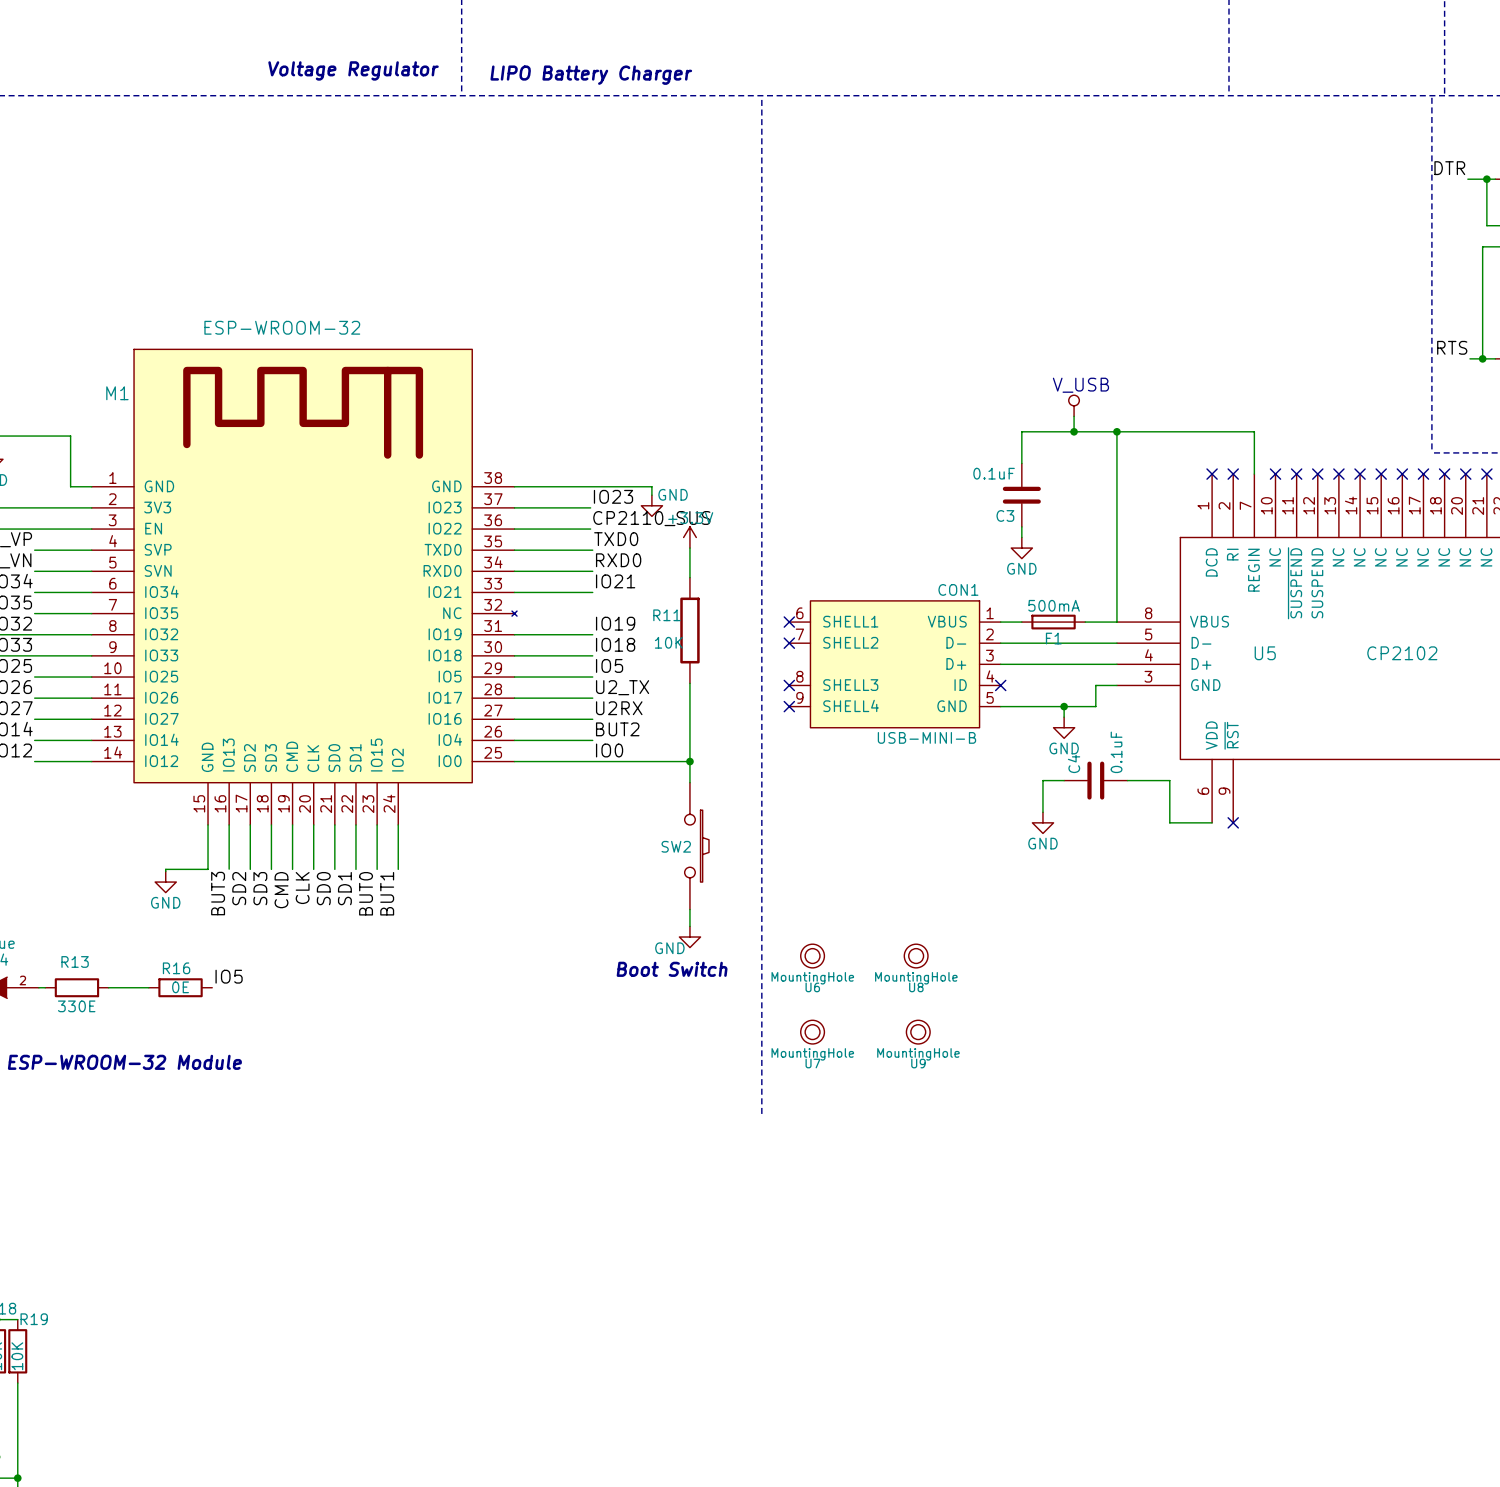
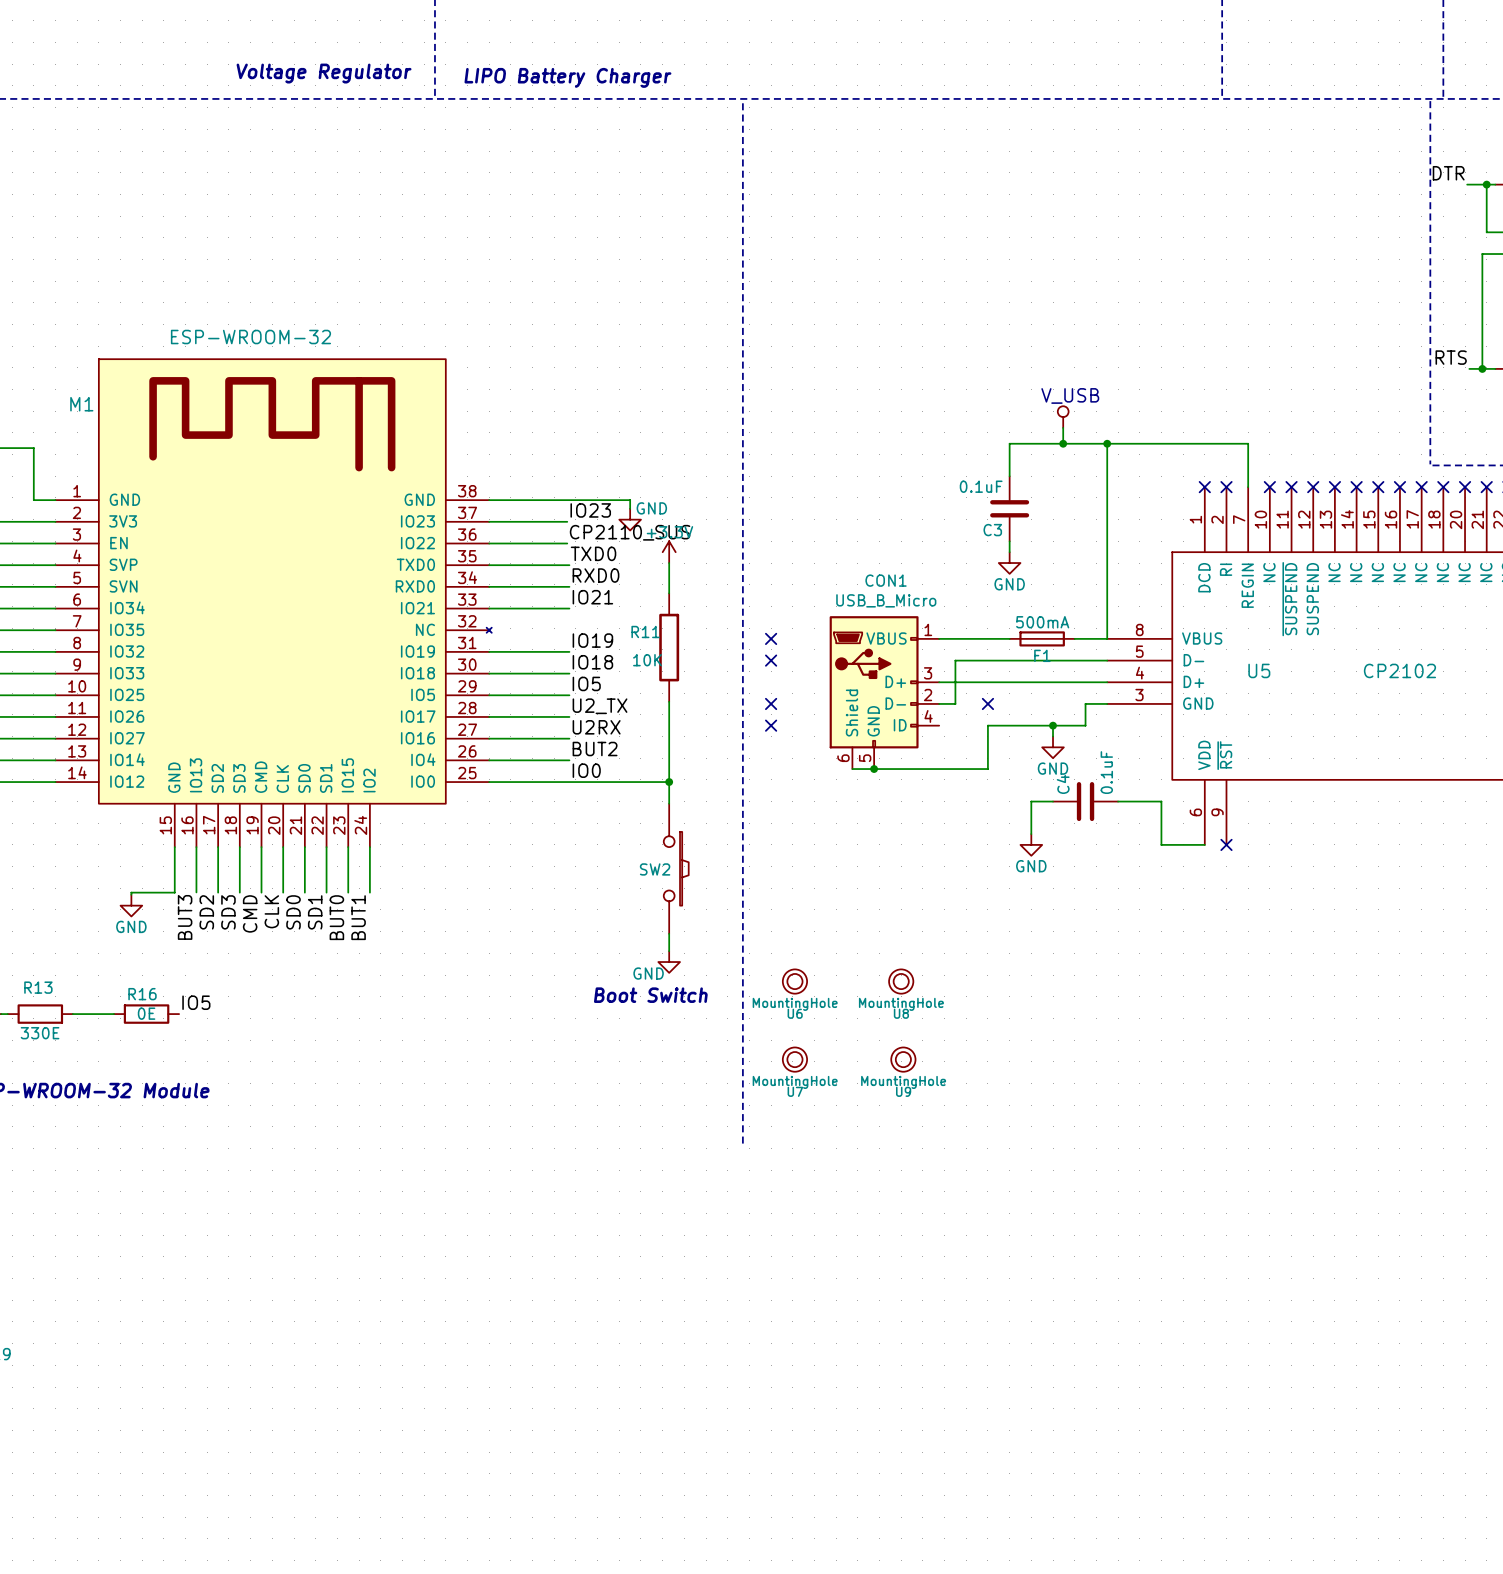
CON1 name position: CON1 (958, 589) -> CON1 (886, 580)
CON1 symbol: [789, 600, 1001, 728] -> [829, 616, 940, 770]
wire: none -> (987, 725) (987, 769) (852, 769)
CON1 value: USB-MINI-B (926, 737) -> USB_B_Micro (886, 600)
junction: none -> (874, 769)

